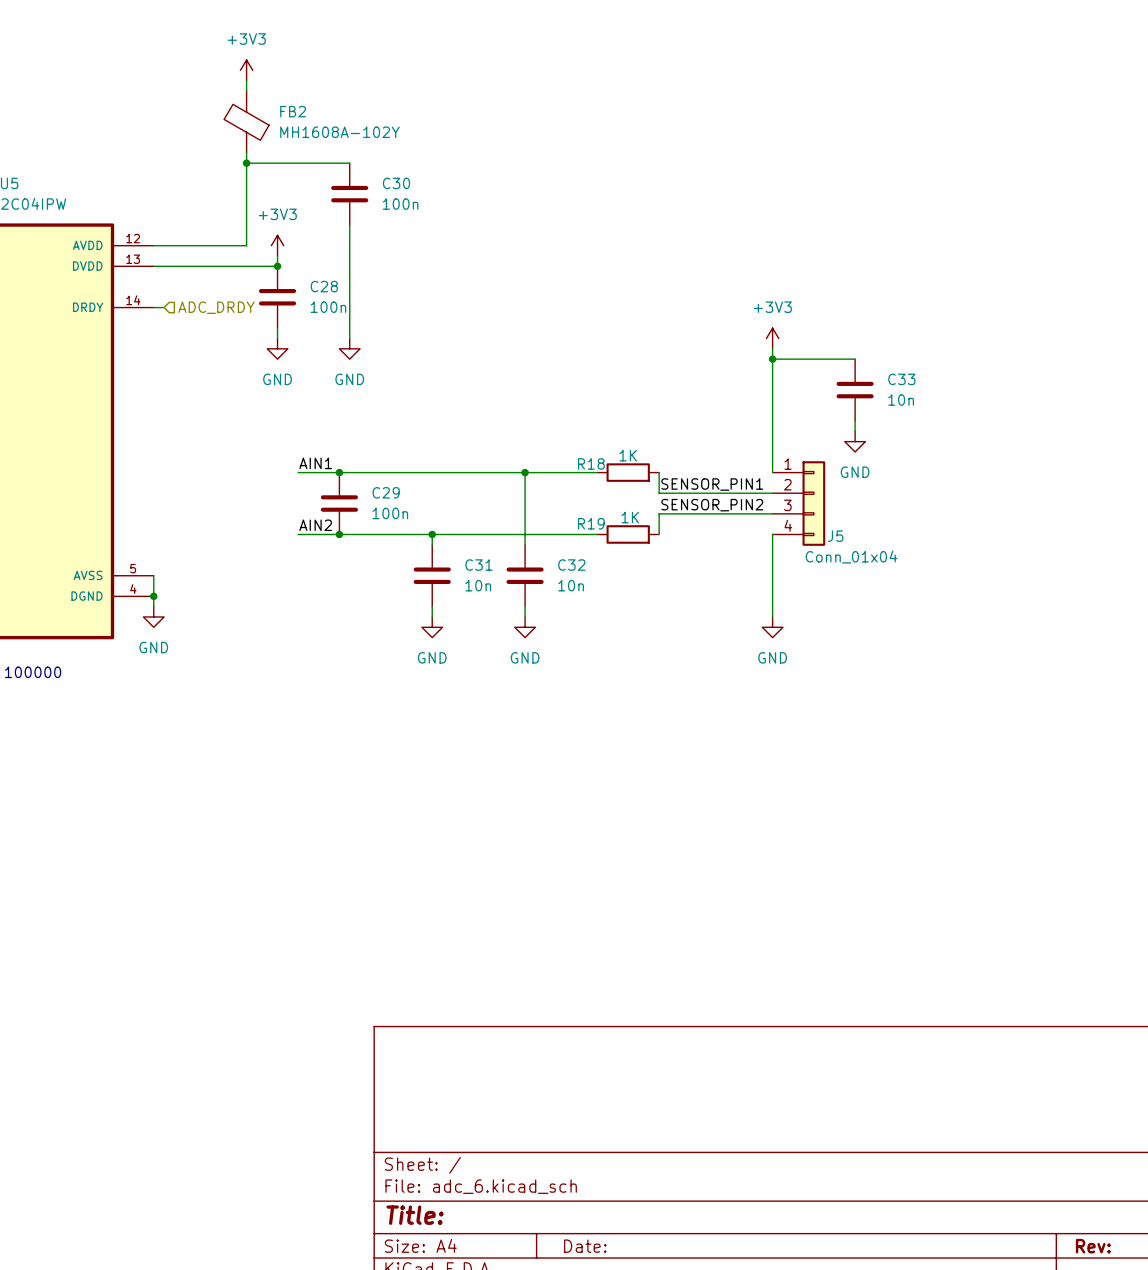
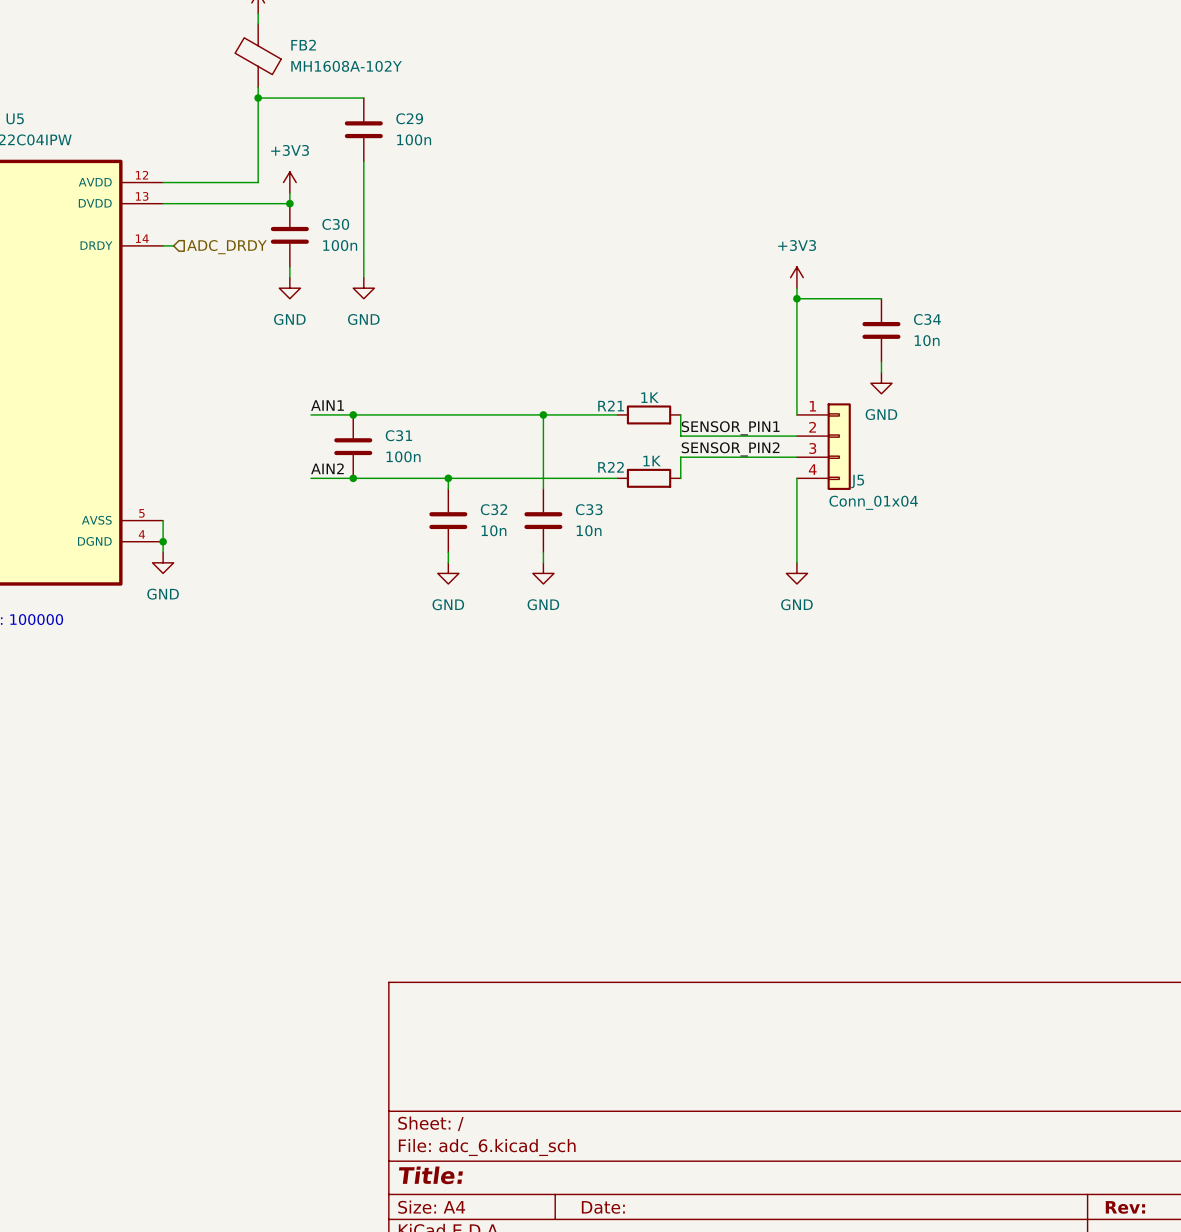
C30 name: C30 (396, 183) -> C29 (409, 118)
C28 name: C28 (324, 286) -> C30 (335, 224)
C33 name: C33 (901, 379) -> C34 (927, 319)
R18 name: R18 (591, 463) -> R21 (611, 406)
C29 name: C29 (386, 492) -> C31 (398, 435)
R19 name: R19 (591, 523) -> R22 (611, 467)
C31 name: C31 (478, 565) -> C32 (493, 509)
C32 name: C32 (571, 565) -> C33 (589, 509)

